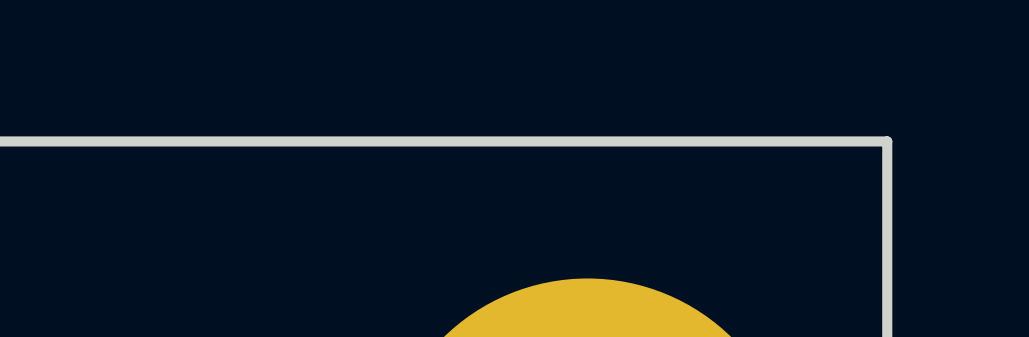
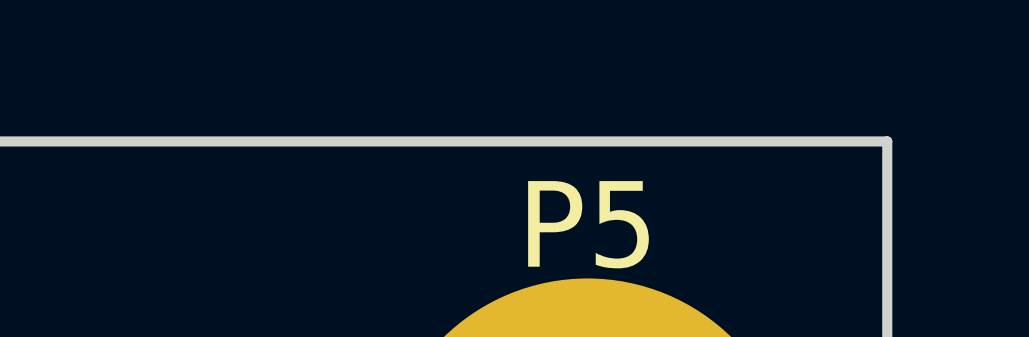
P5 name: none -> P5 (588, 224)

